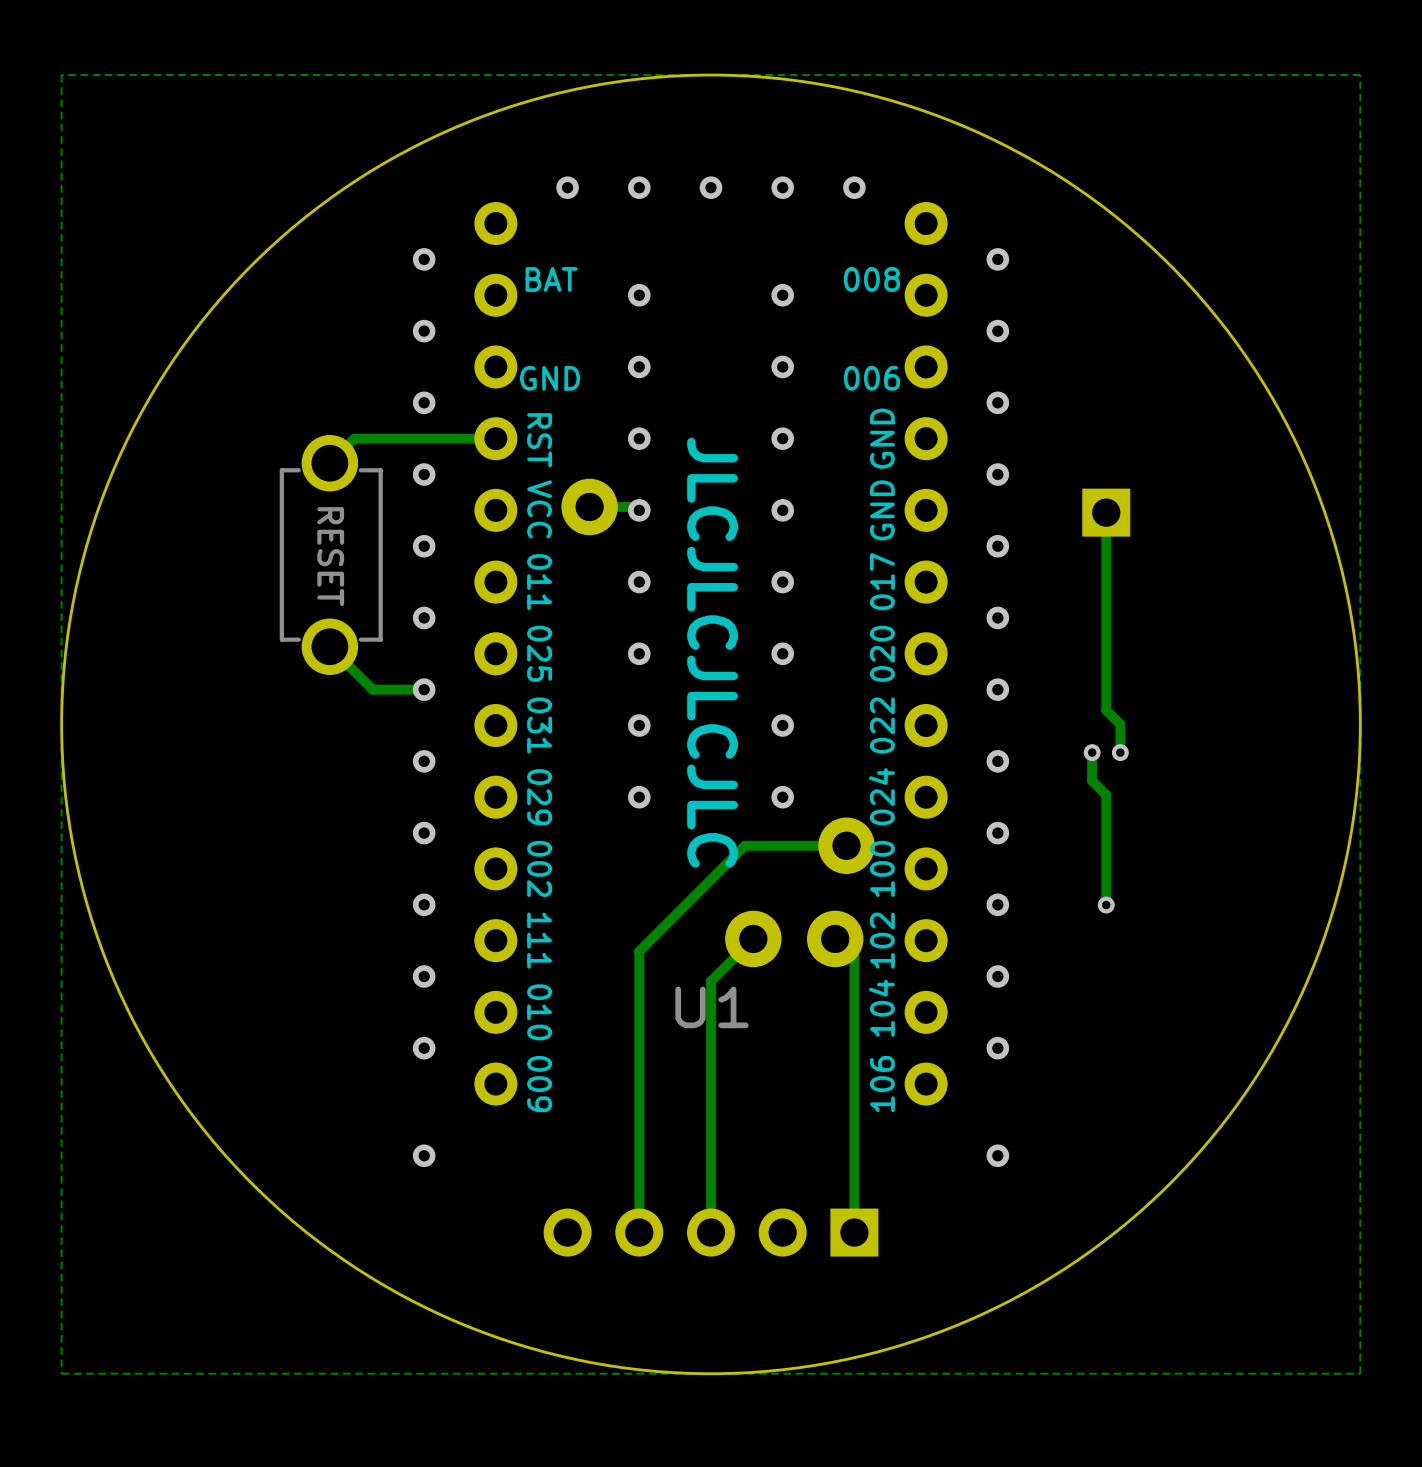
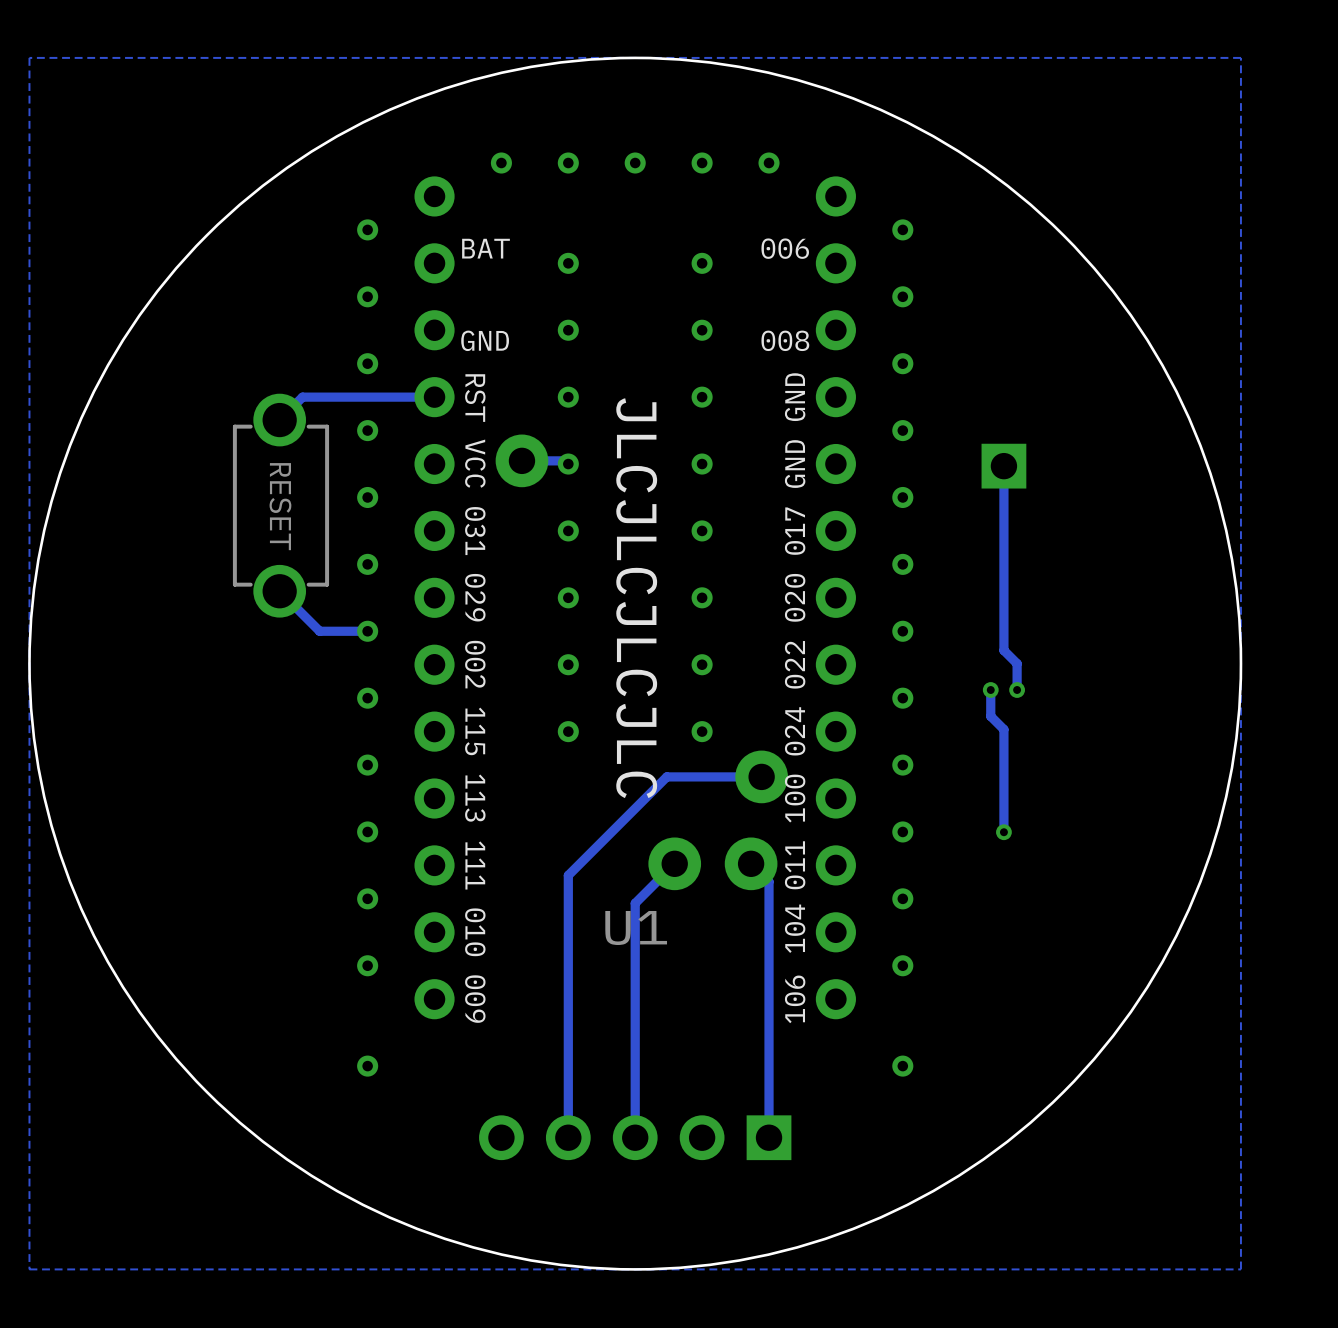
U1 footprint: [474, 202, 948, 1106] -> [414, 243, 856, 1020]

